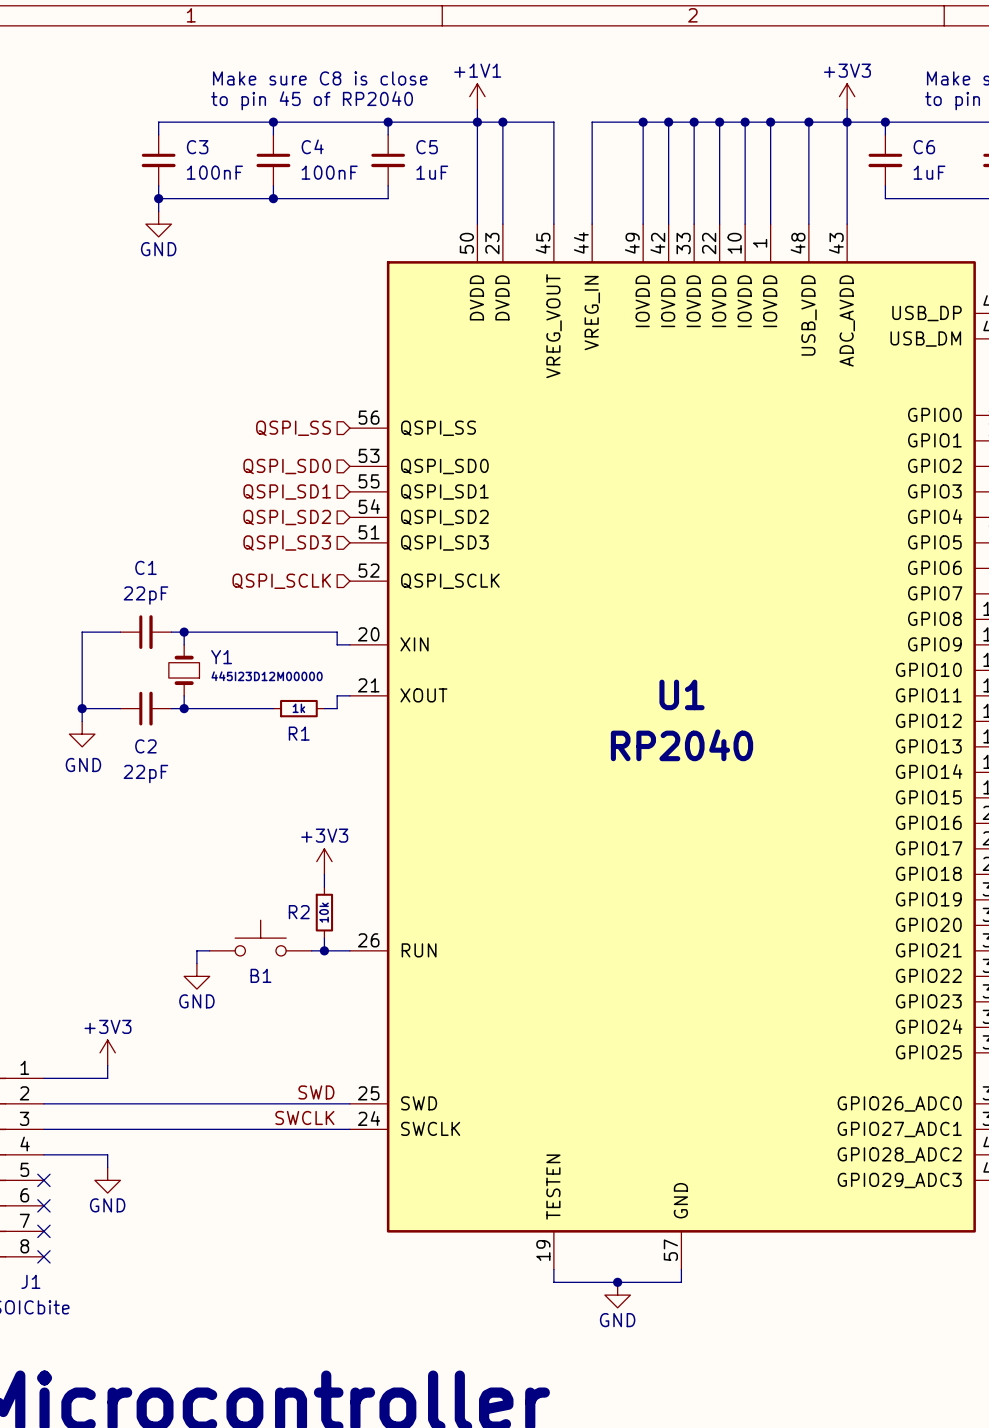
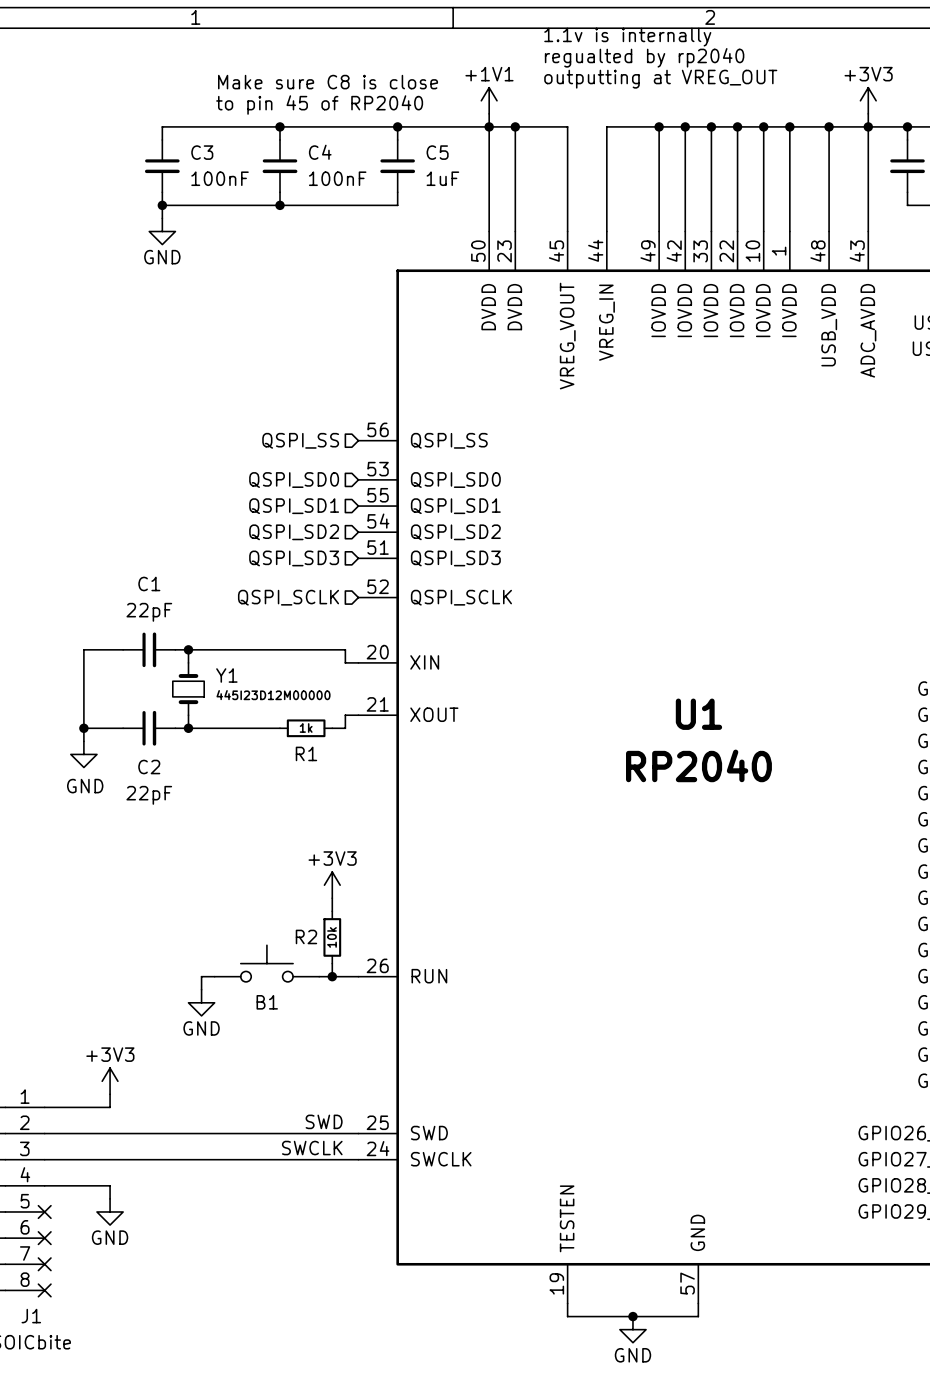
text: none -> 1.1v is internally (627, 37)
text: none -> regualted by rp2040 (644, 57)
text: none -> outputting at VREG_OUT (660, 79)

